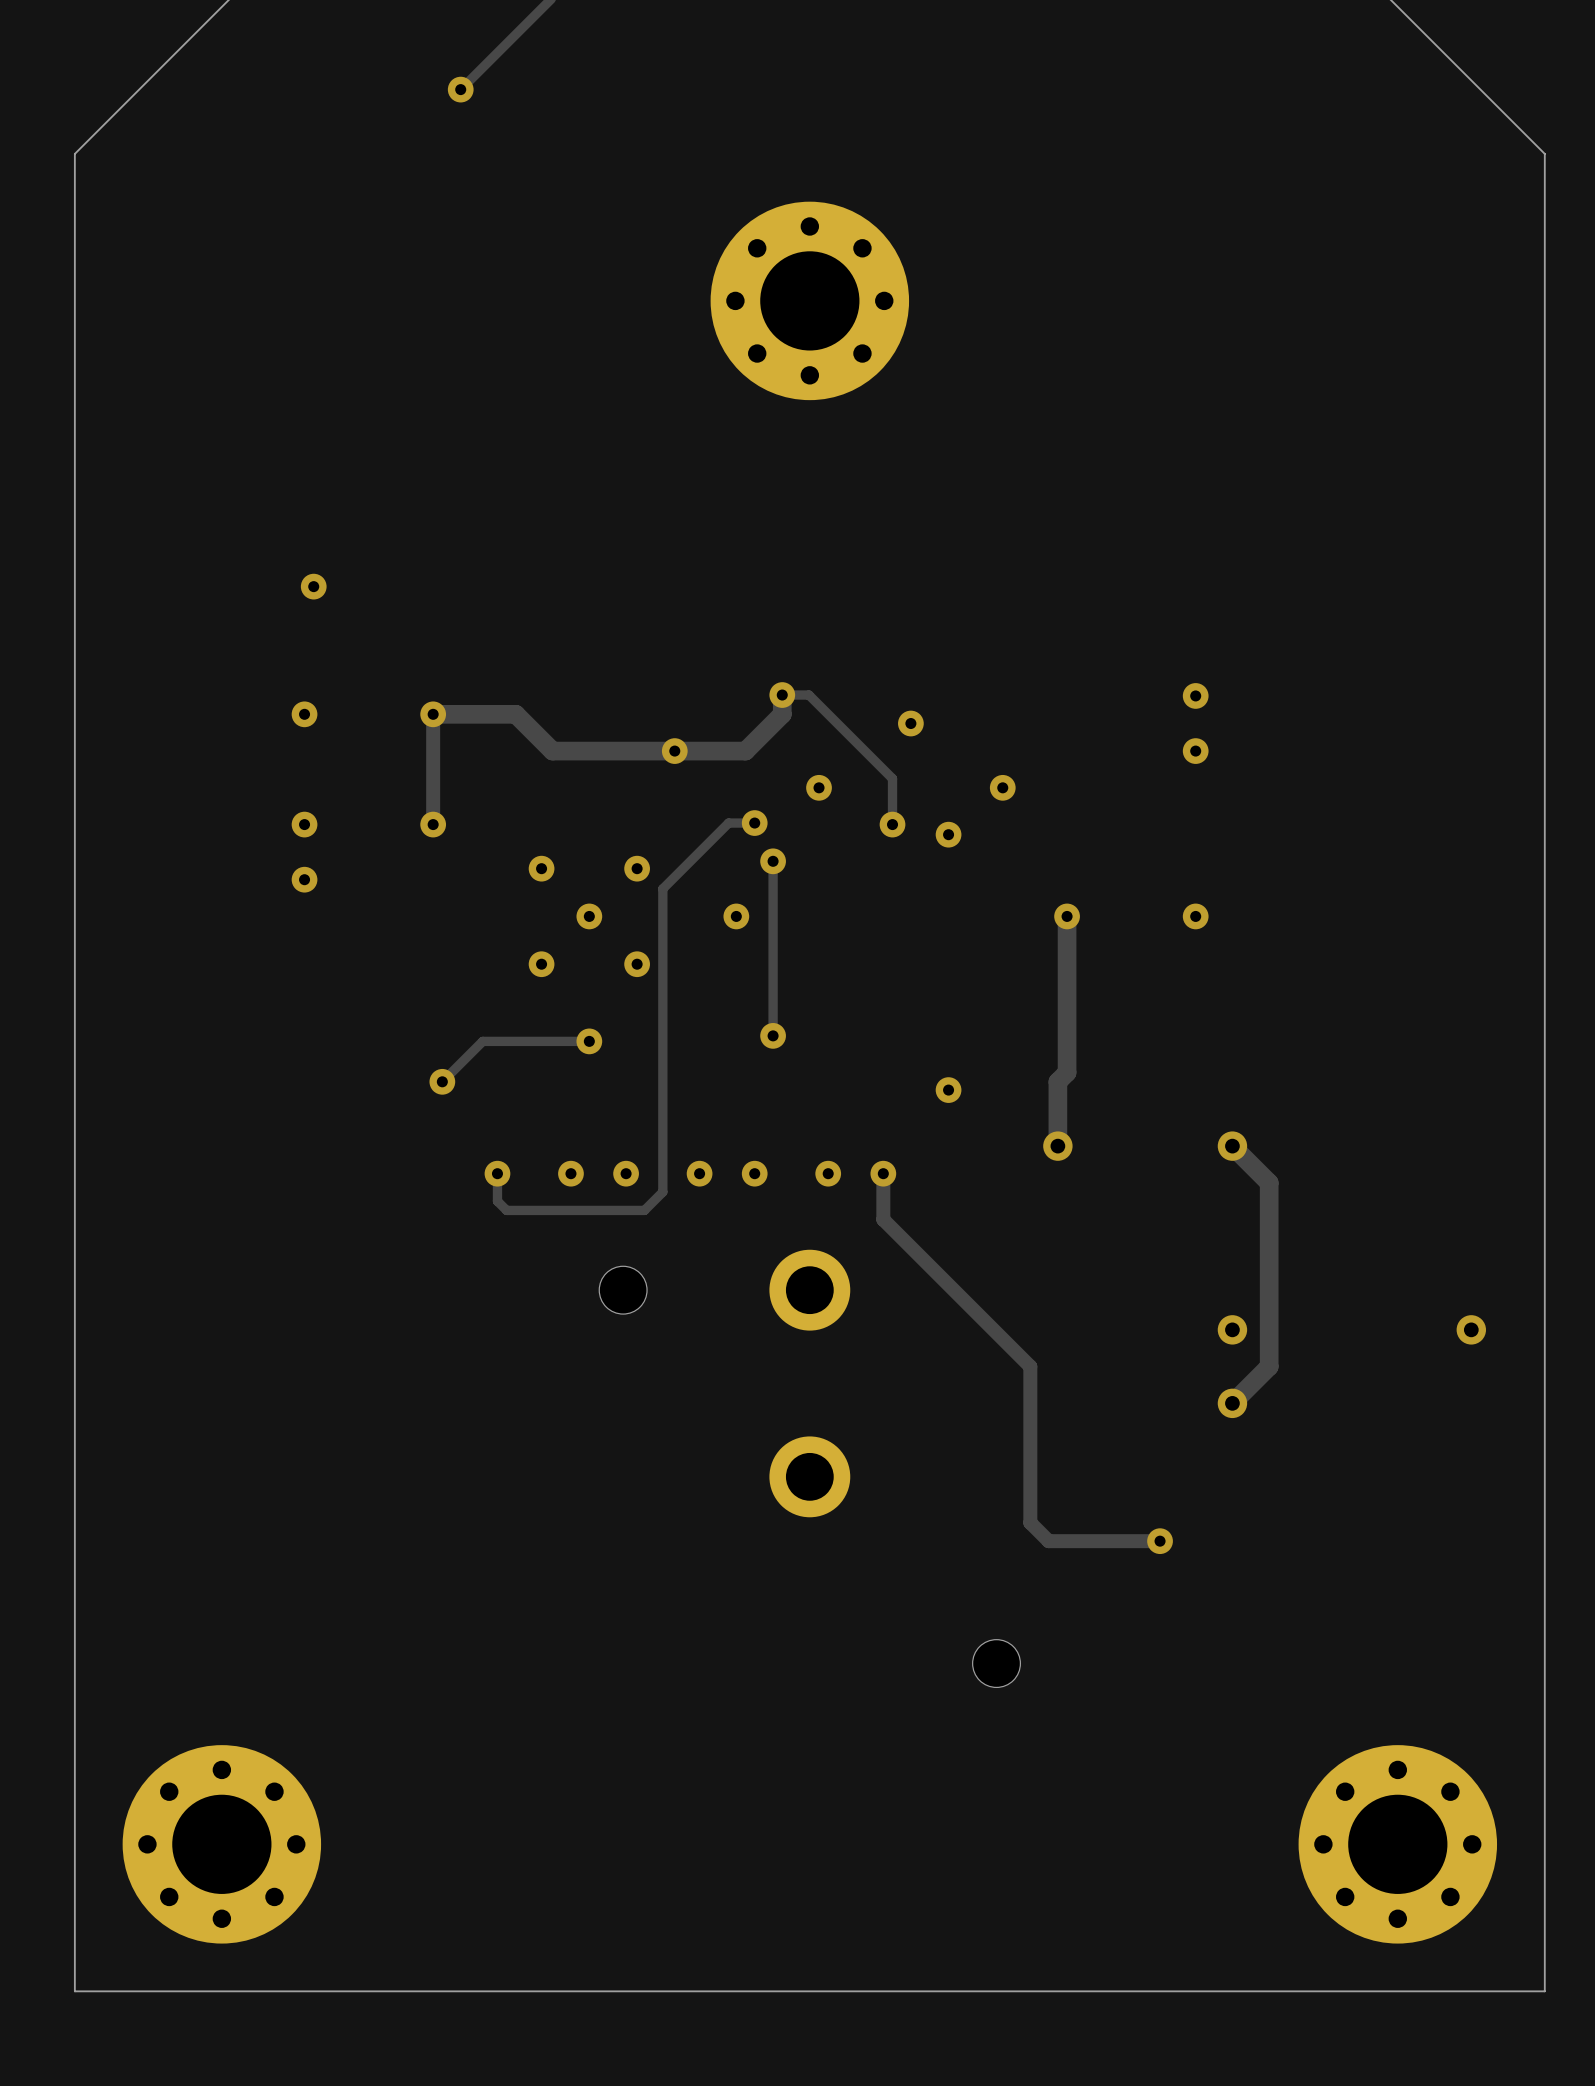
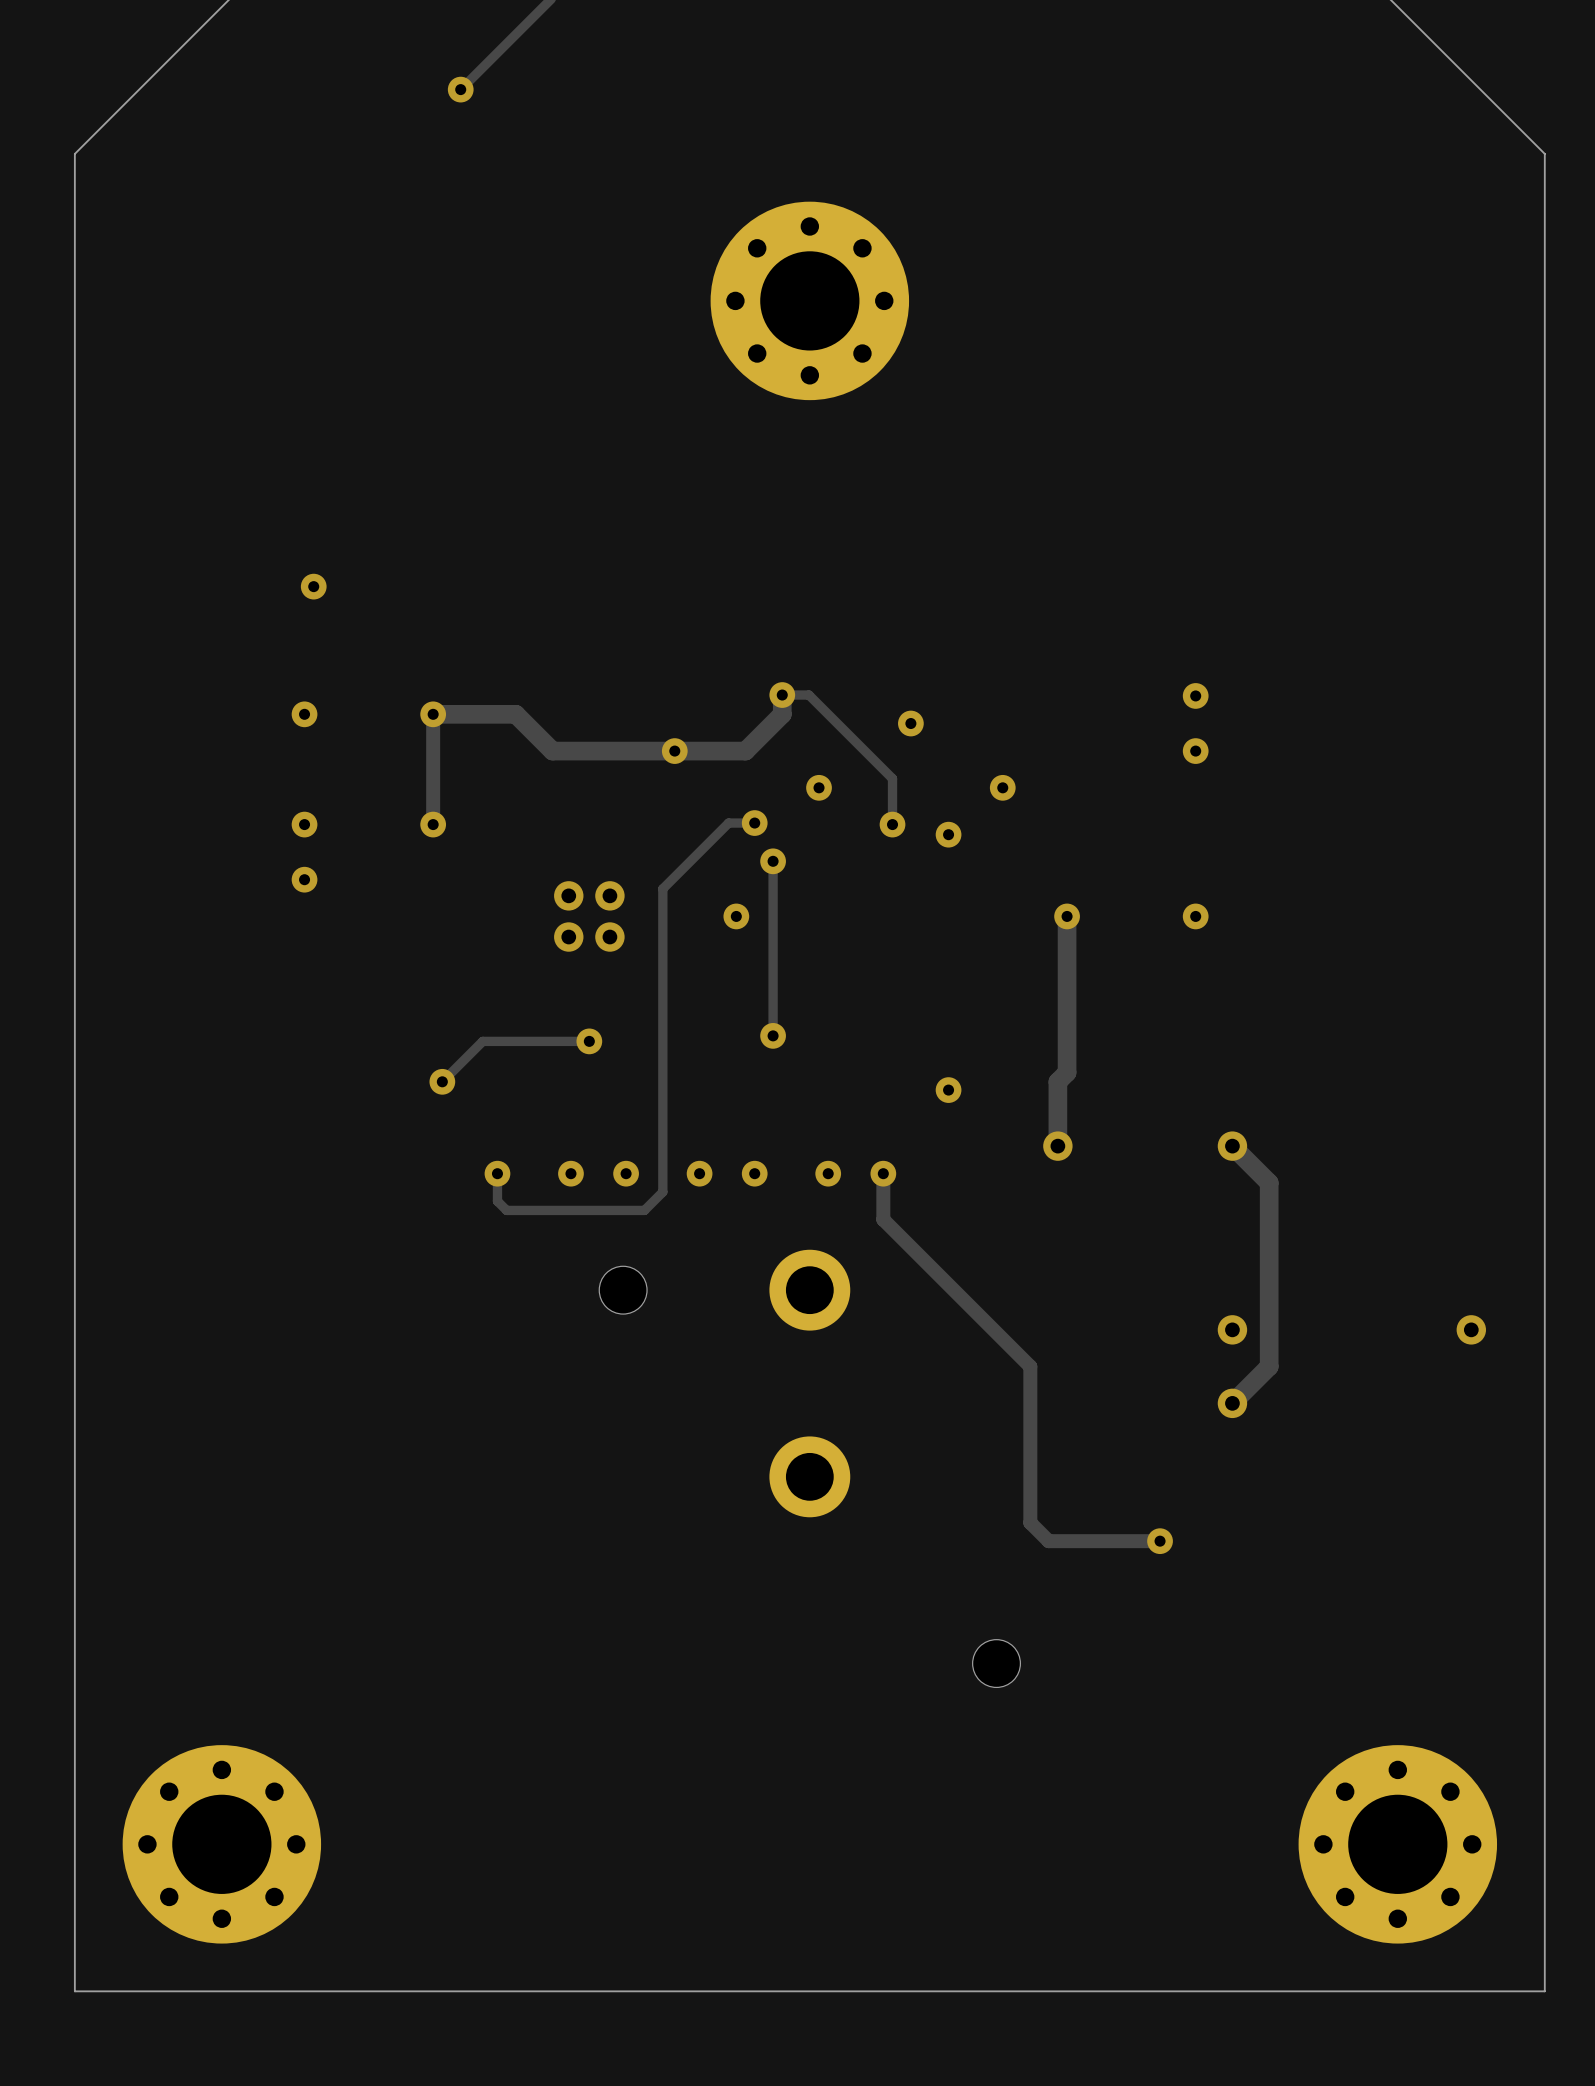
via: (541, 868) -> none
via: (637, 868) -> none
via: none -> (568, 895)
via: none -> (609, 895)
via: (589, 916) -> none
via: none -> (568, 937)
via: none -> (609, 937)
via: (541, 964) -> none
via: (637, 964) -> none

